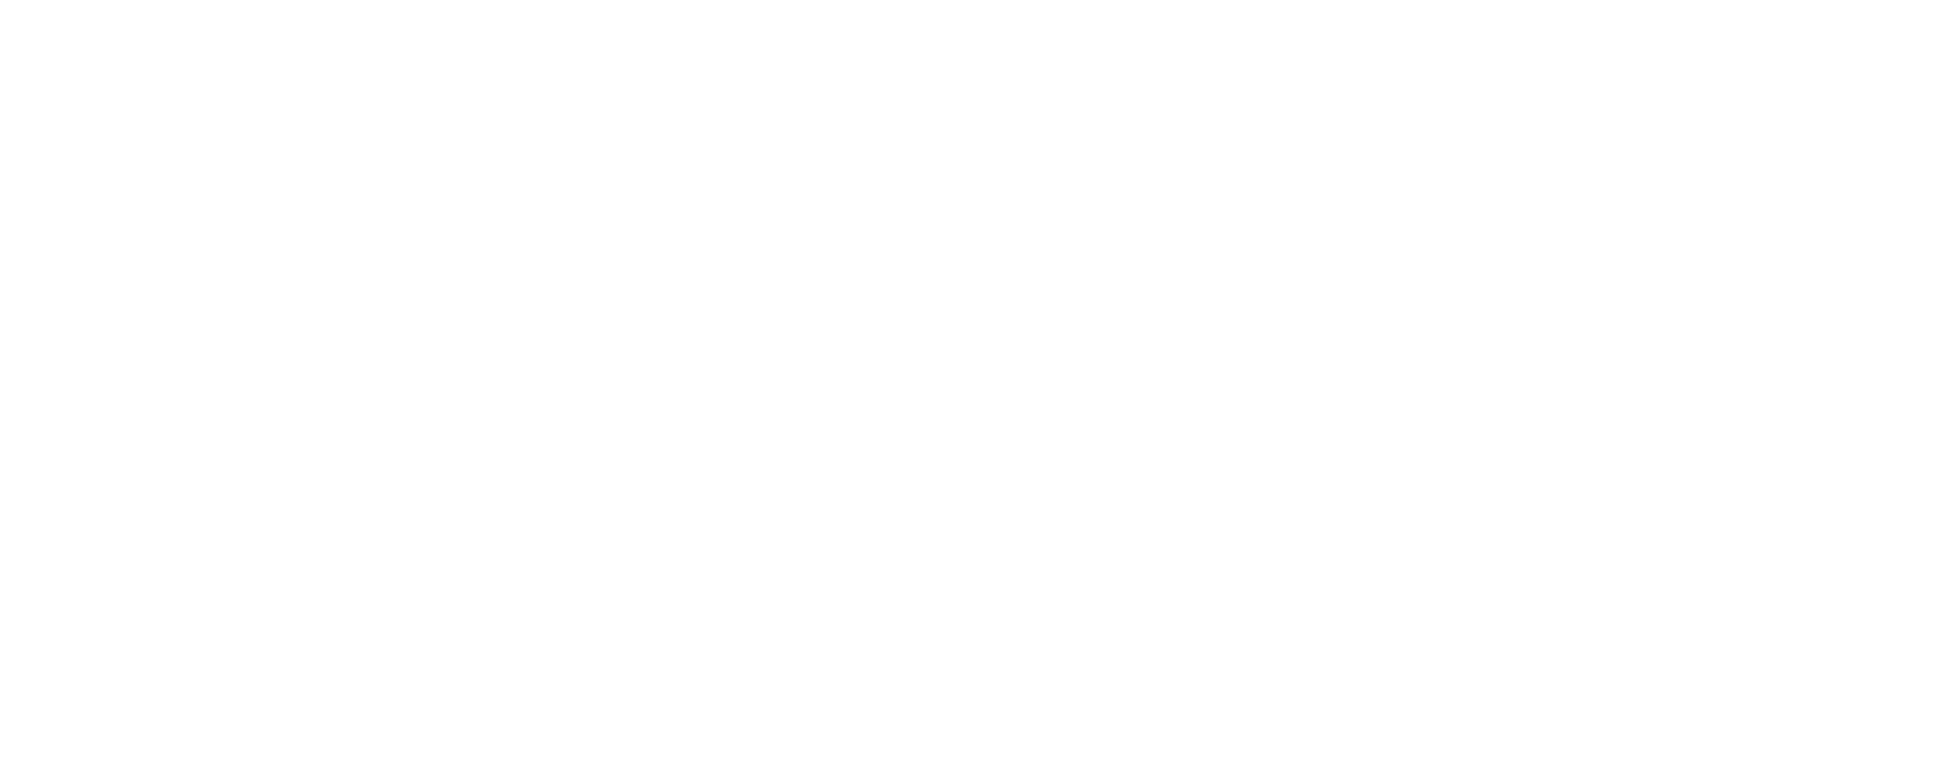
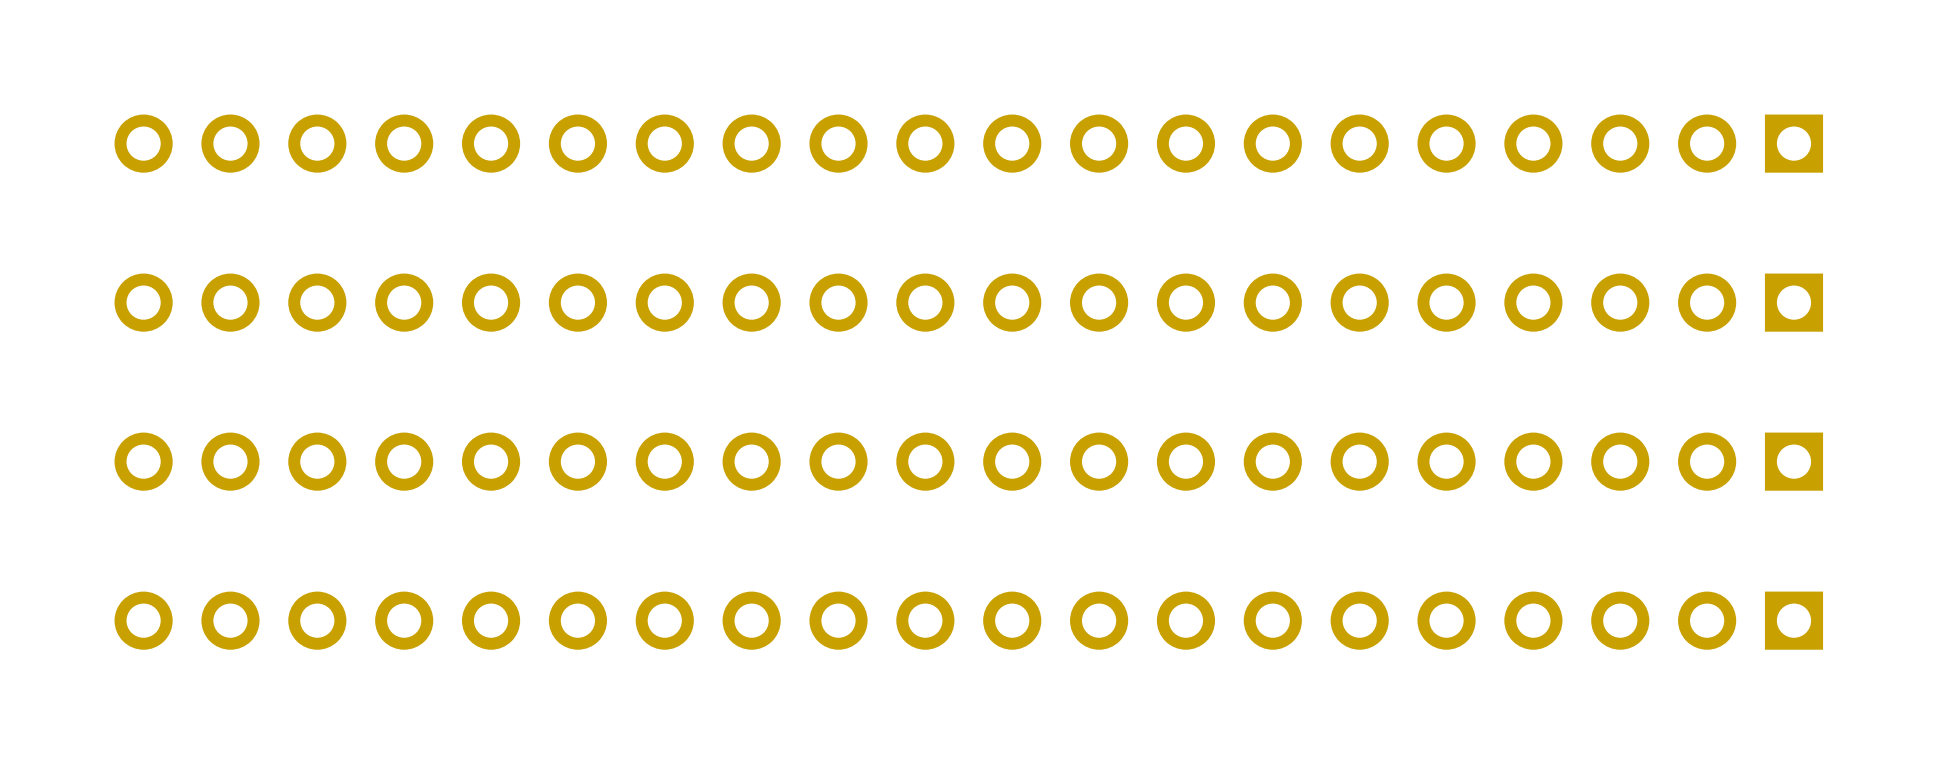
part: none -> (968, 143)
part: none -> (968, 302)
part: none -> (968, 461)
part: none -> (968, 620)

